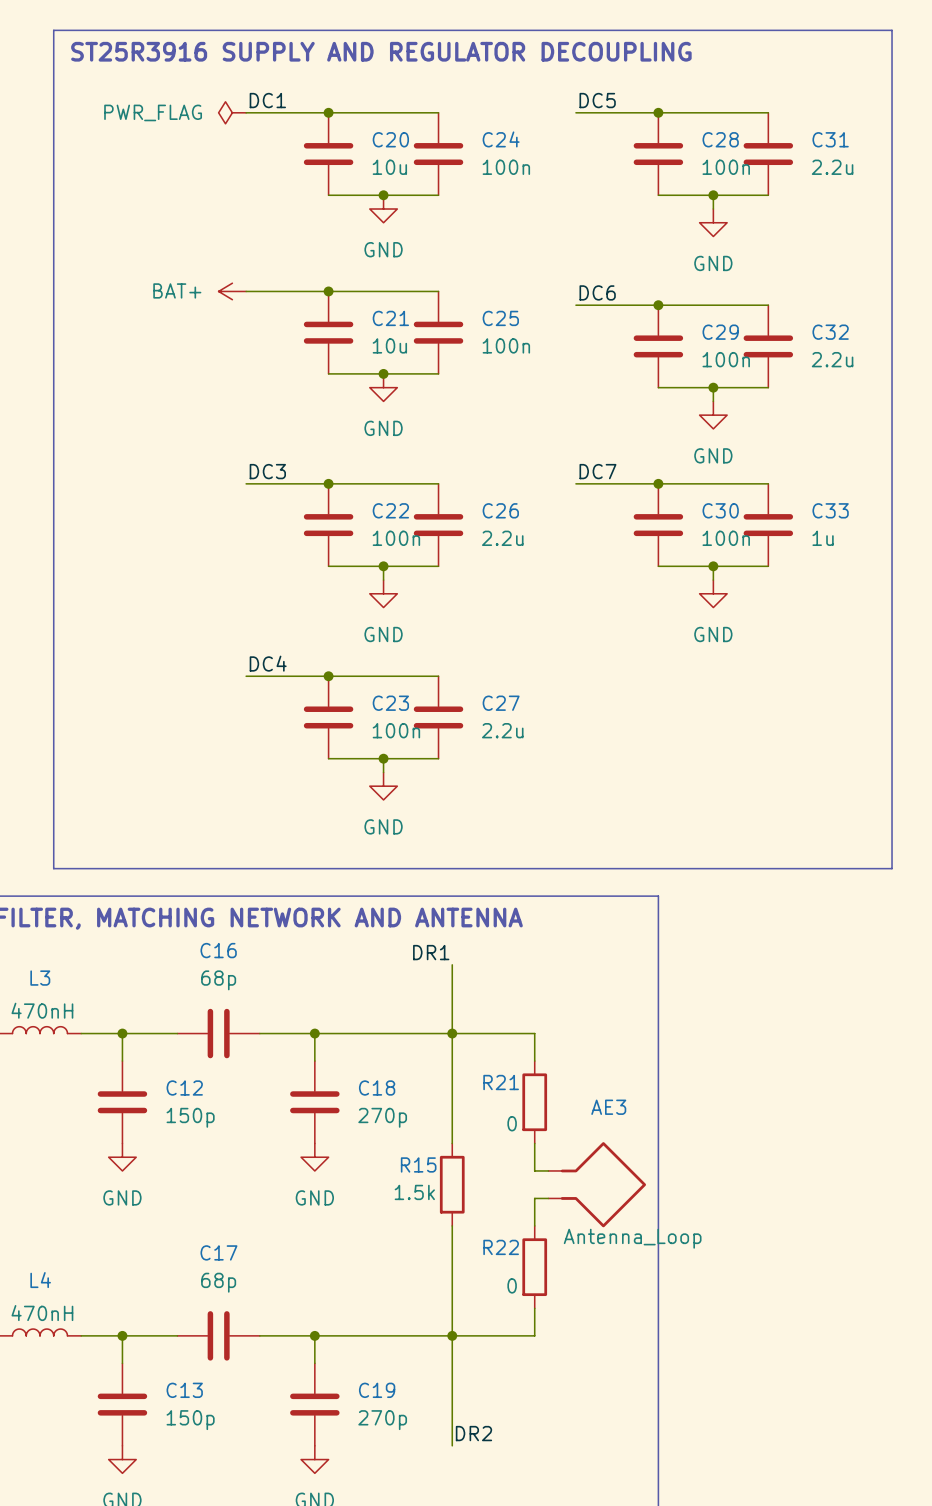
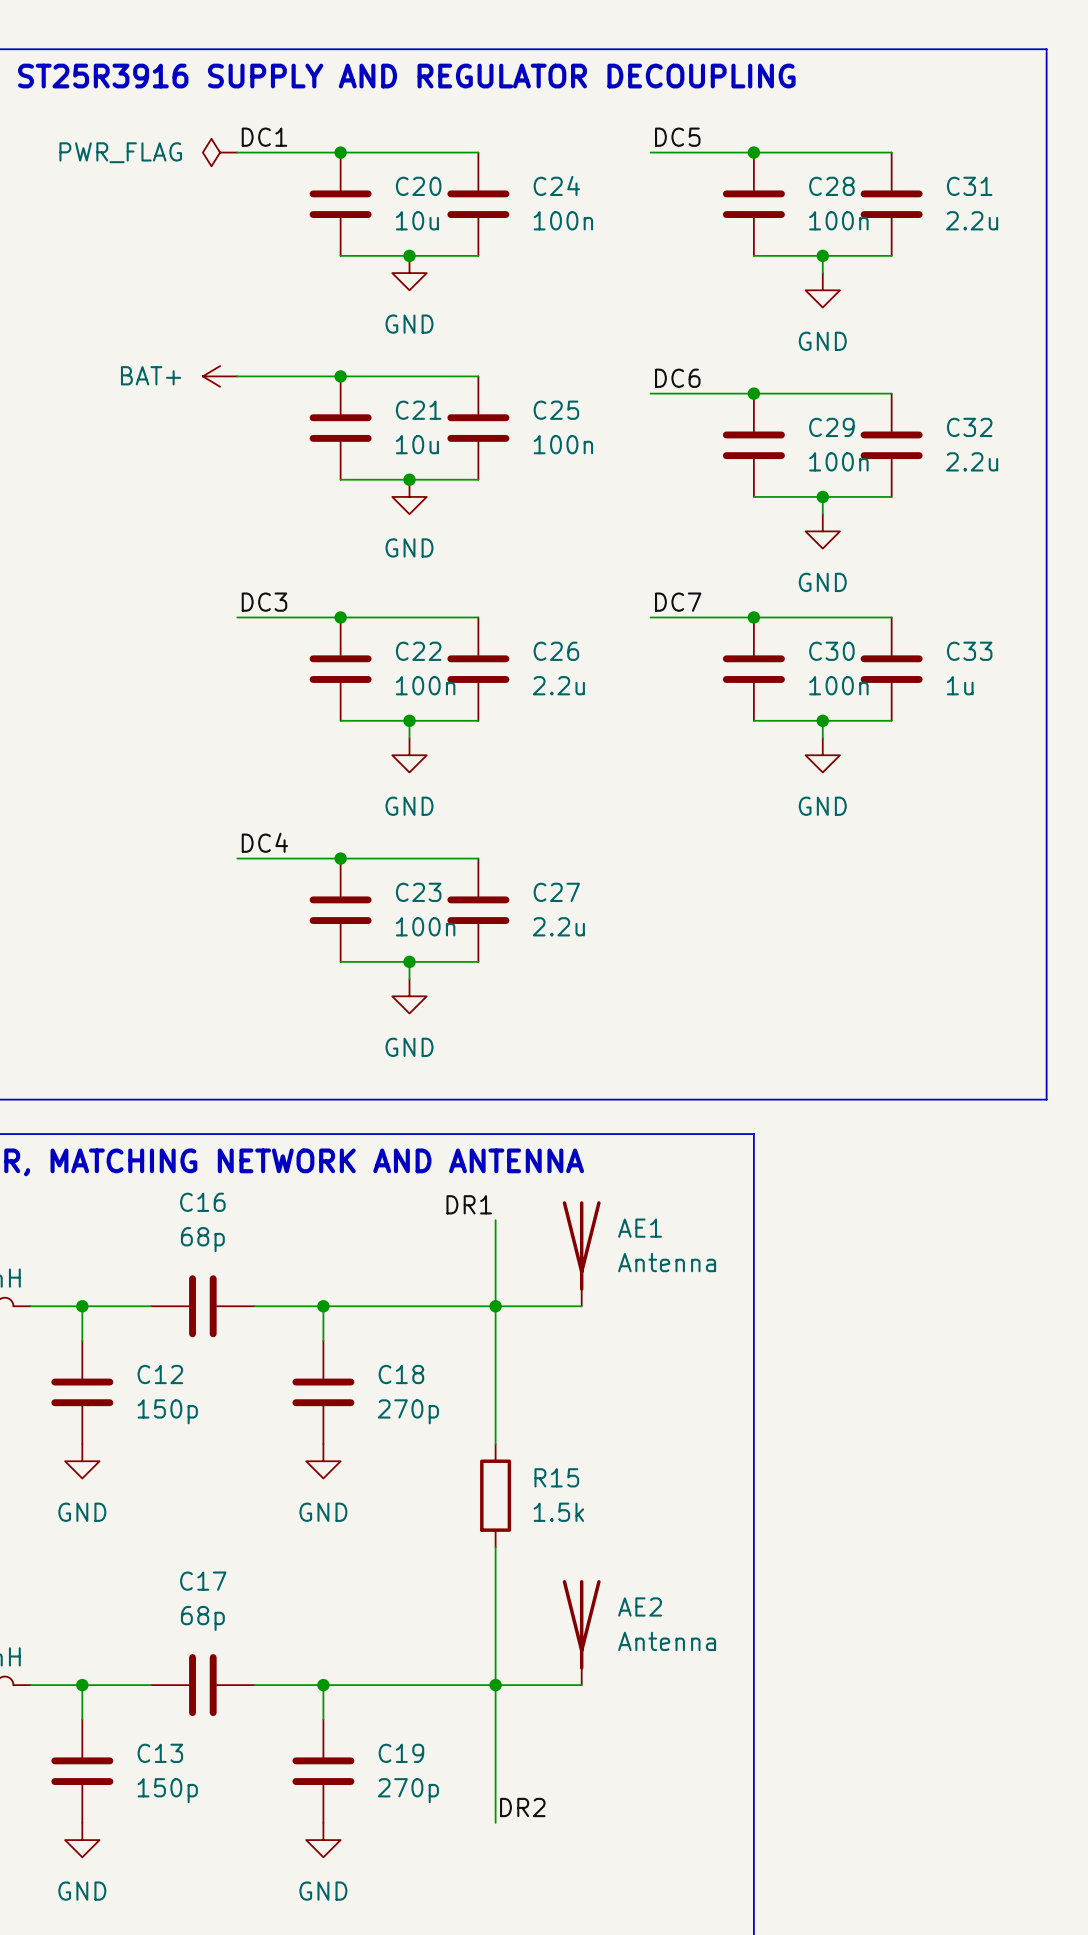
AE1: none -> Antenna (581, 1253)
wire: (520, 1033) (534, 1033) (534, 1061) -> none
R21: 0 (534, 1102) -> none
wire: (534, 1143) (534, 1170) (548, 1170) -> none
R15 name position: R15 (418, 1164) -> R15 (556, 1477)
AE3: Antenna_Loop (597, 1184) -> none
R15 value position: 1.5k (414, 1192) -> 1.5k (558, 1512)
wire: (548, 1198) (534, 1198) (534, 1225) -> none
R22: 0 (534, 1267) -> none
AE2: none -> Antenna (581, 1632)
wire: (534, 1308) (534, 1335) (520, 1335) -> none

